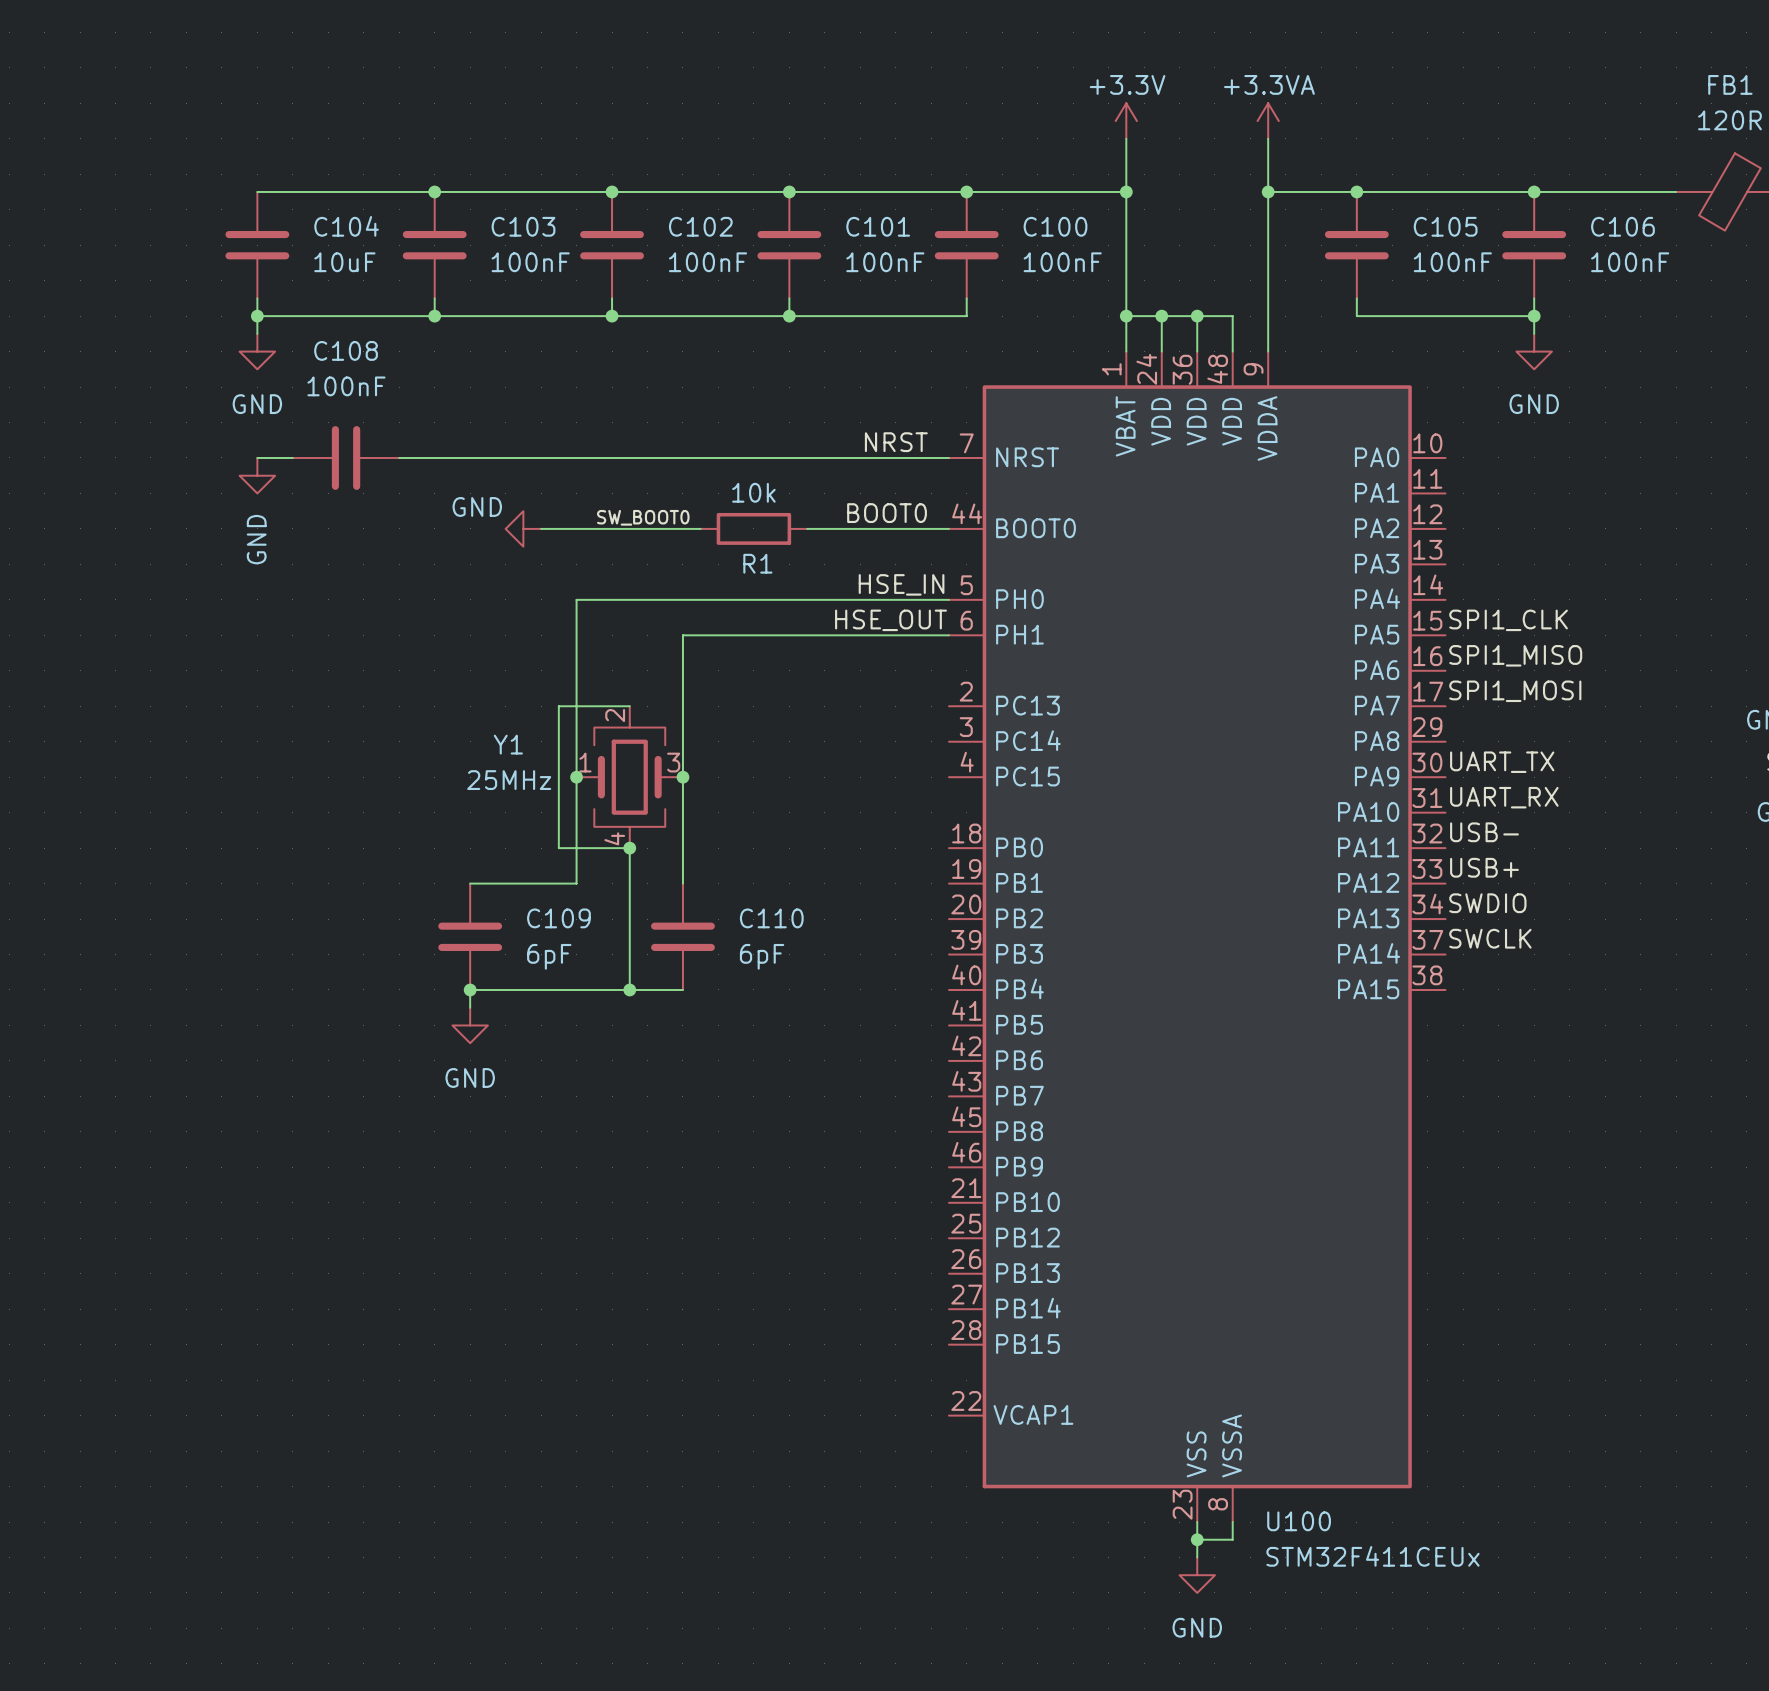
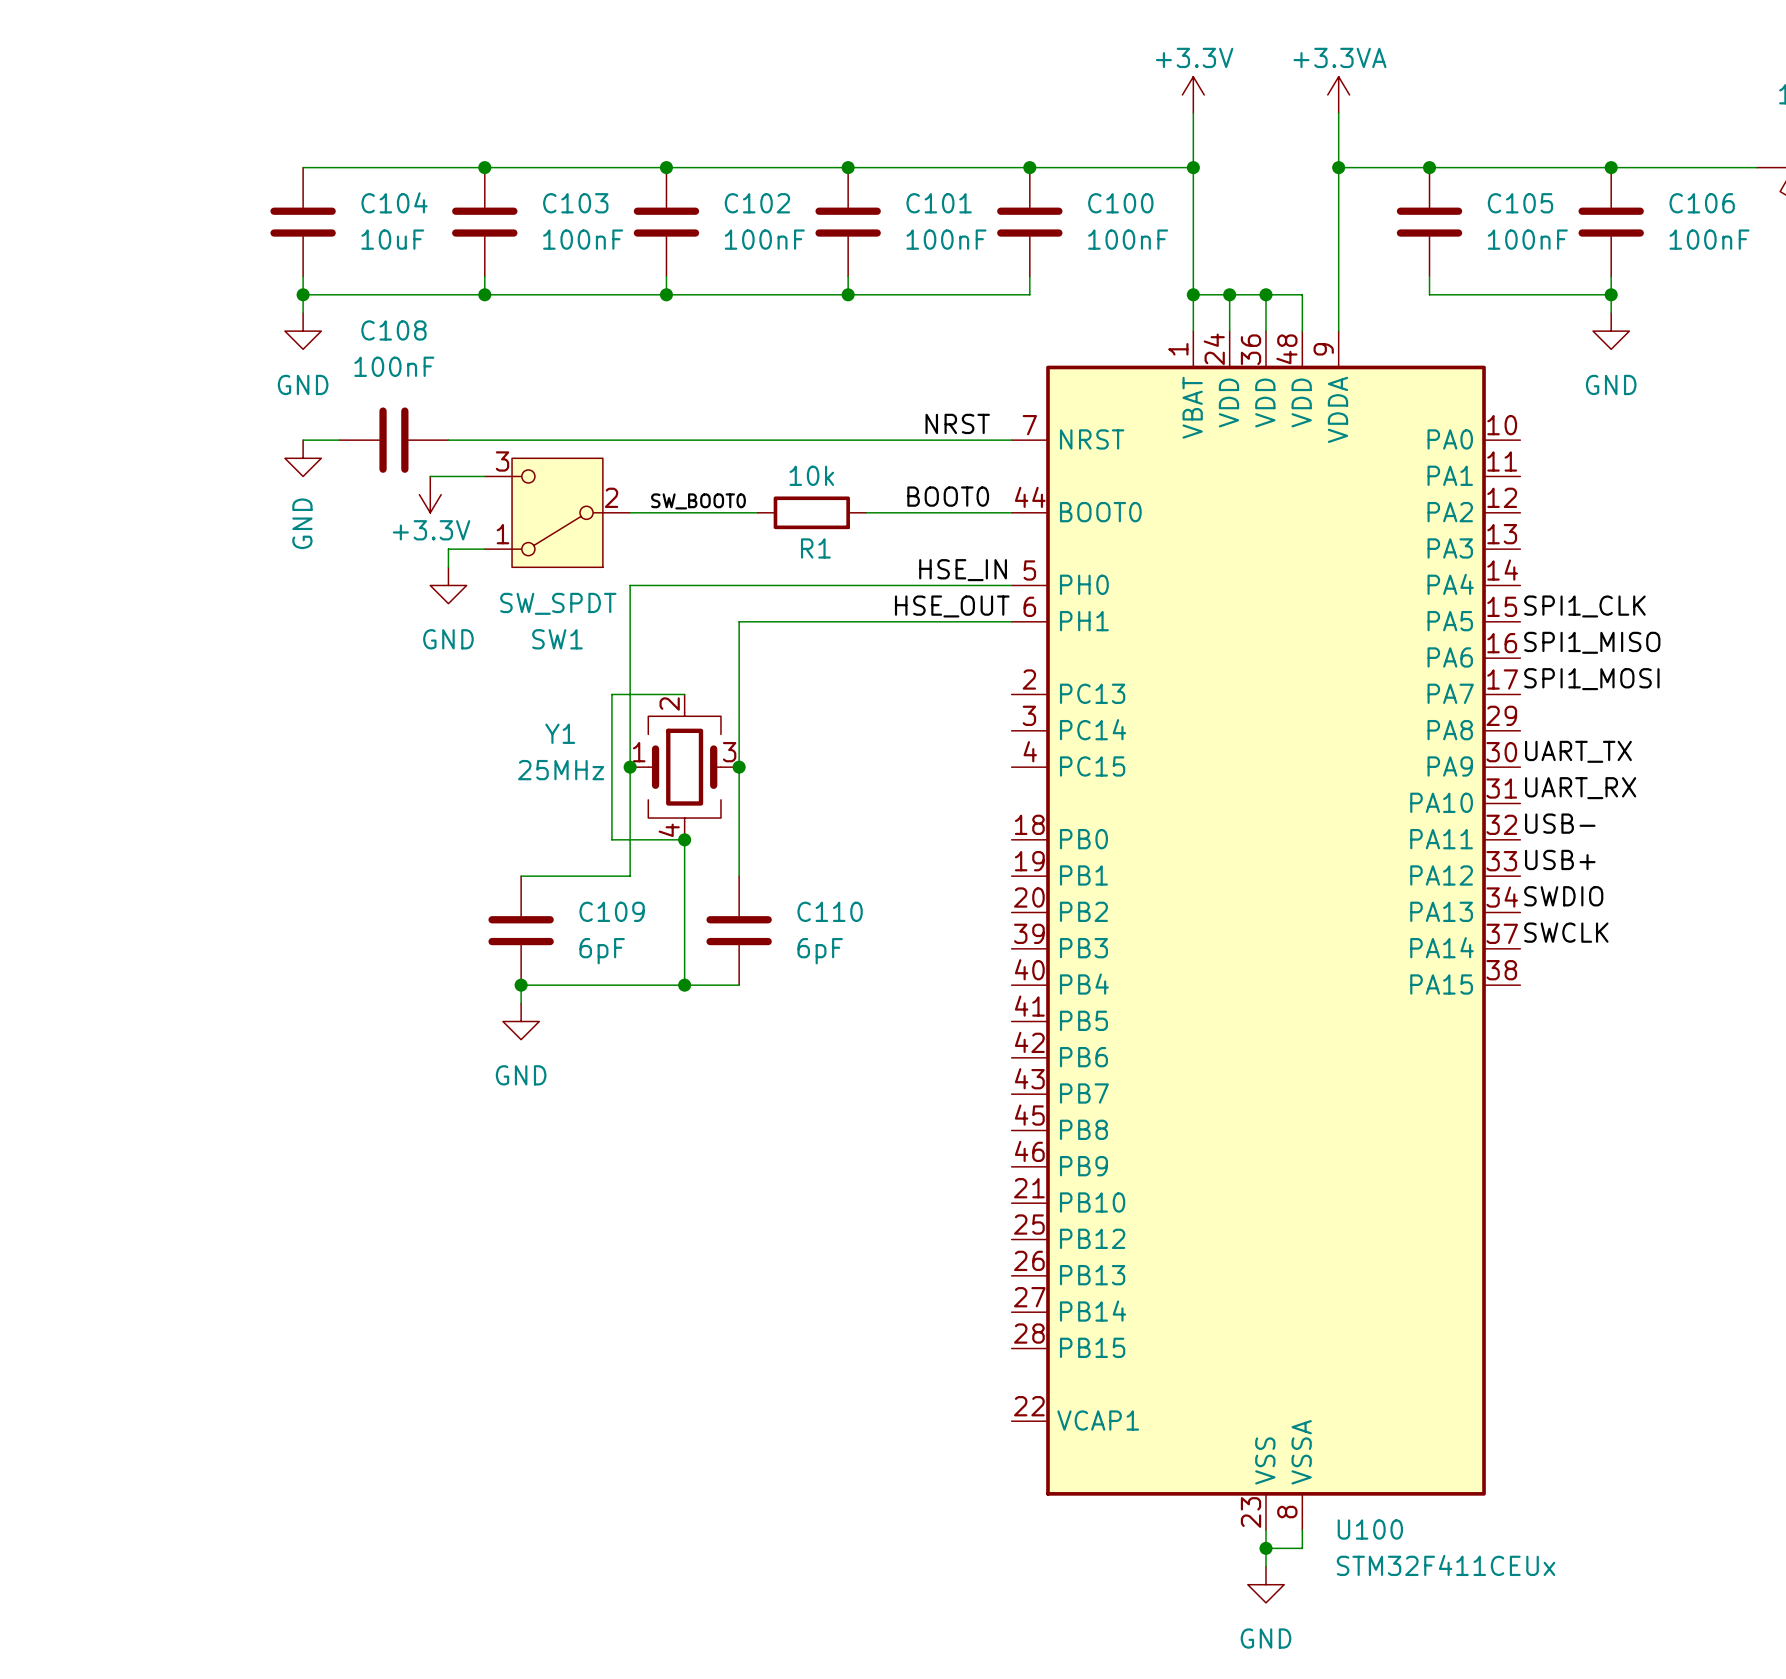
wire: none -> (430, 476) (484, 476)
power symbol: none -> +3.3V (430, 494)
SW1: none -> SW_SPDT (557, 512)
power symbol rotation: 0° (523, 528) -> 90° counterclockwise (448, 585)
power symbol position: GND (523, 528) -> GND (448, 585)
wire: none -> (484, 549) (448, 549) (448, 567)

